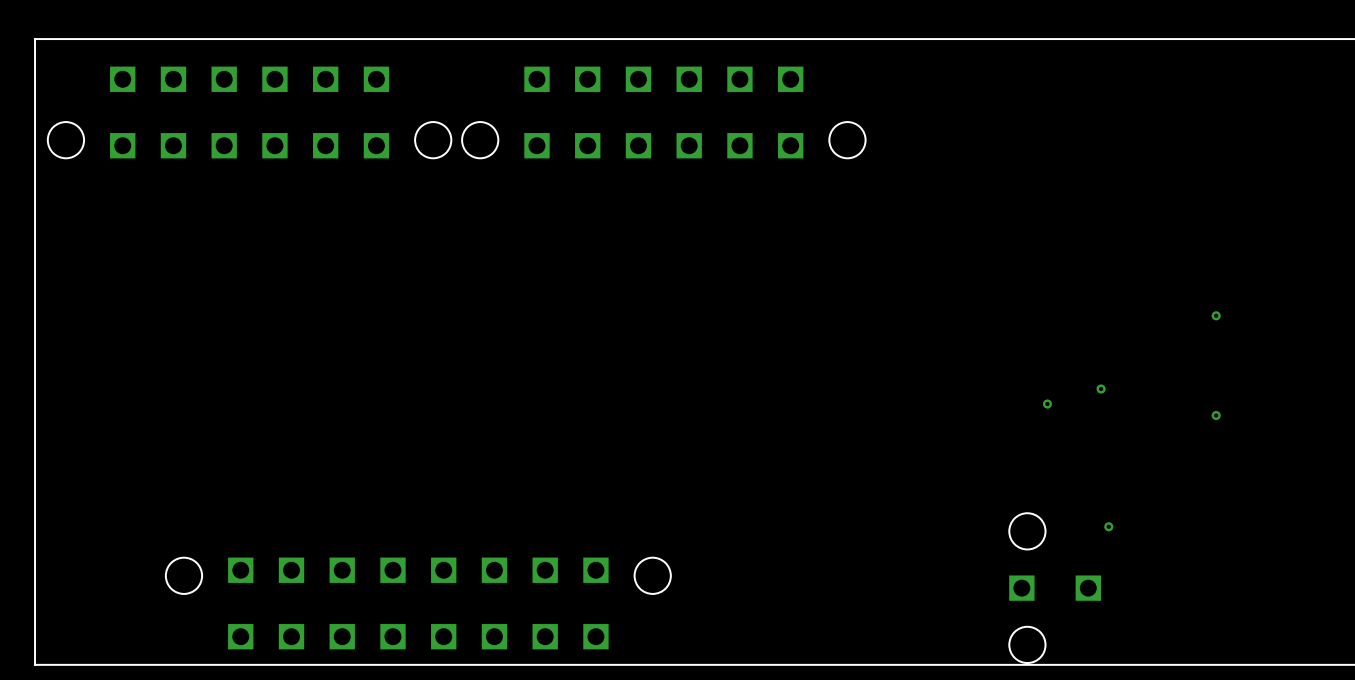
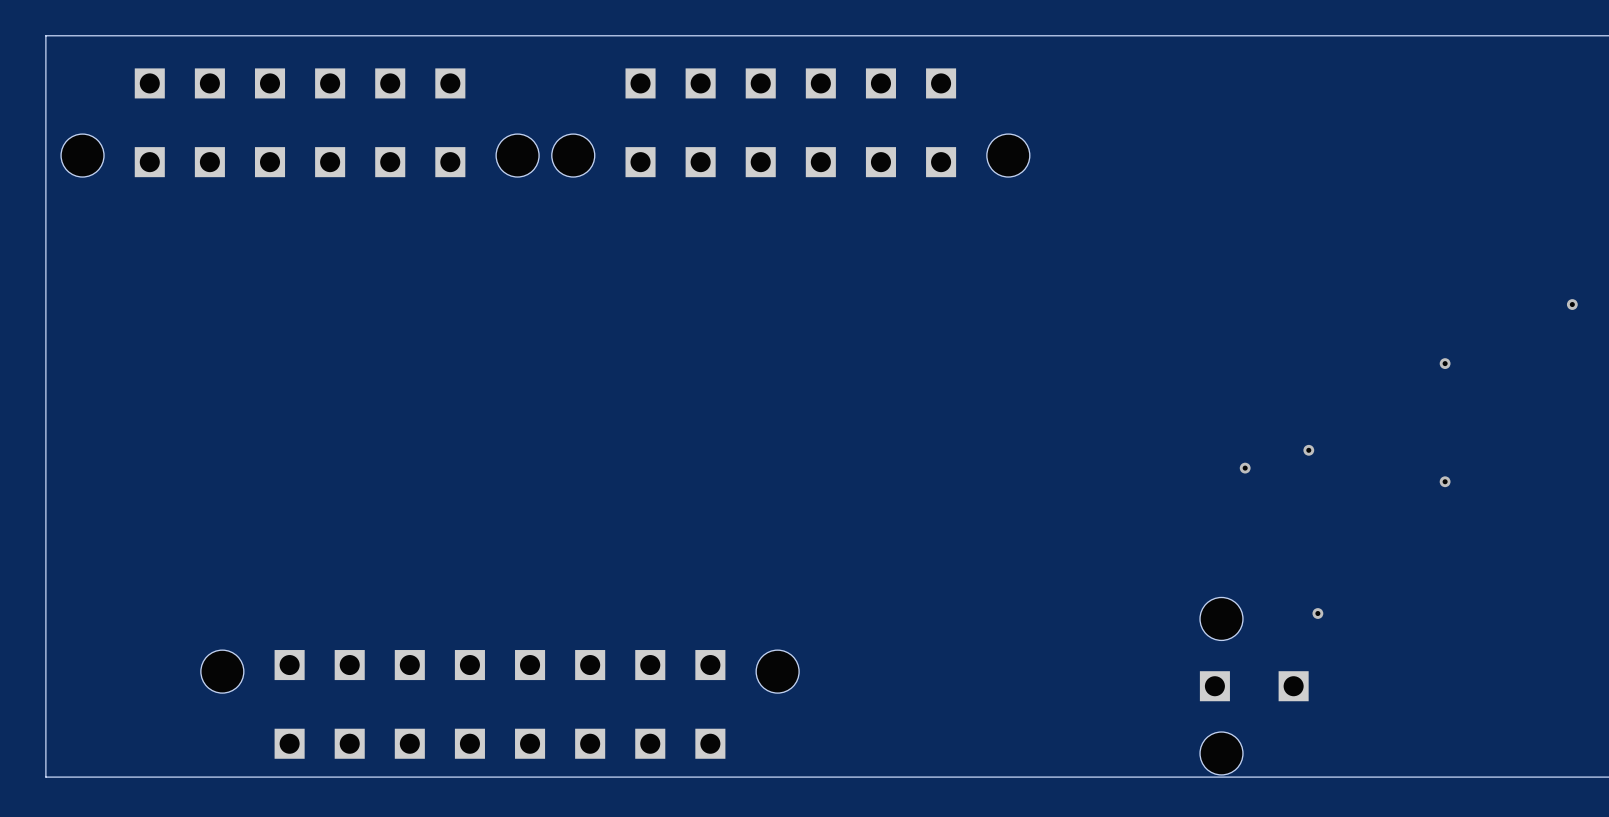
via: none -> (1572, 304)

